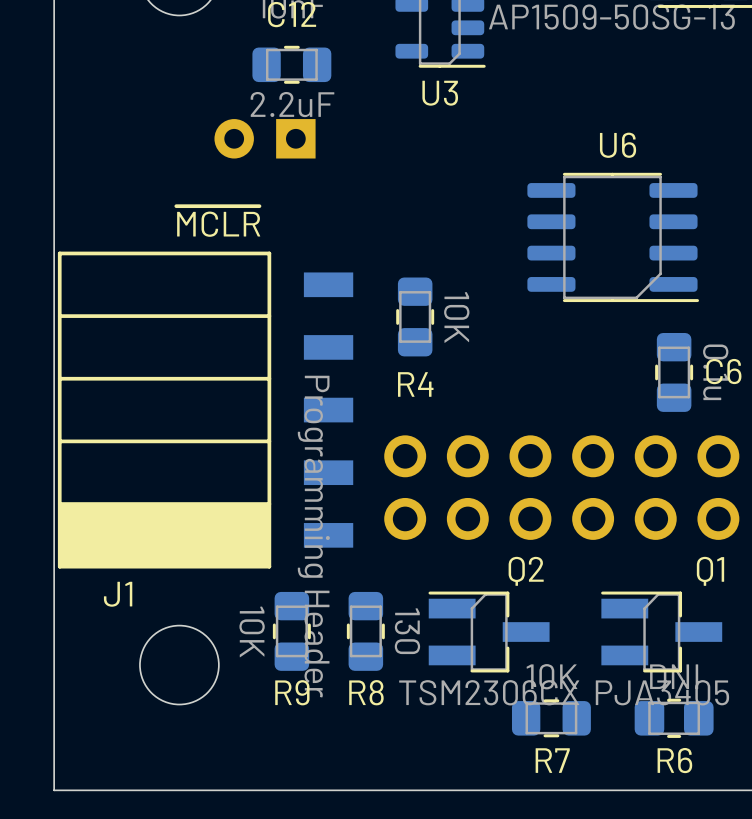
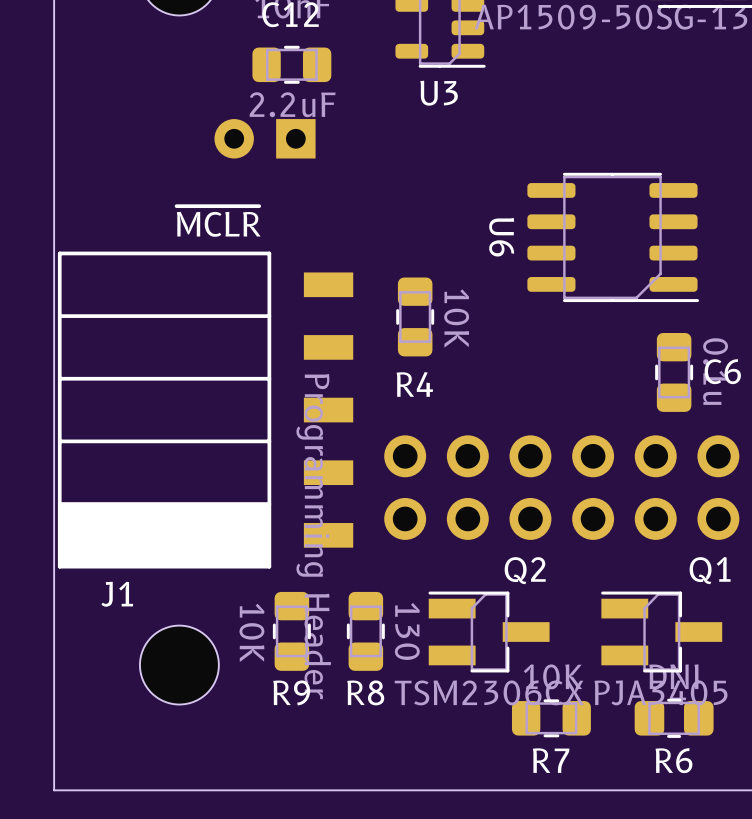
U6 name rotation: 0° (618, 145) -> 90° clockwise (501, 237)
U6 name position: U6 (618, 145) -> U6 (501, 237)

